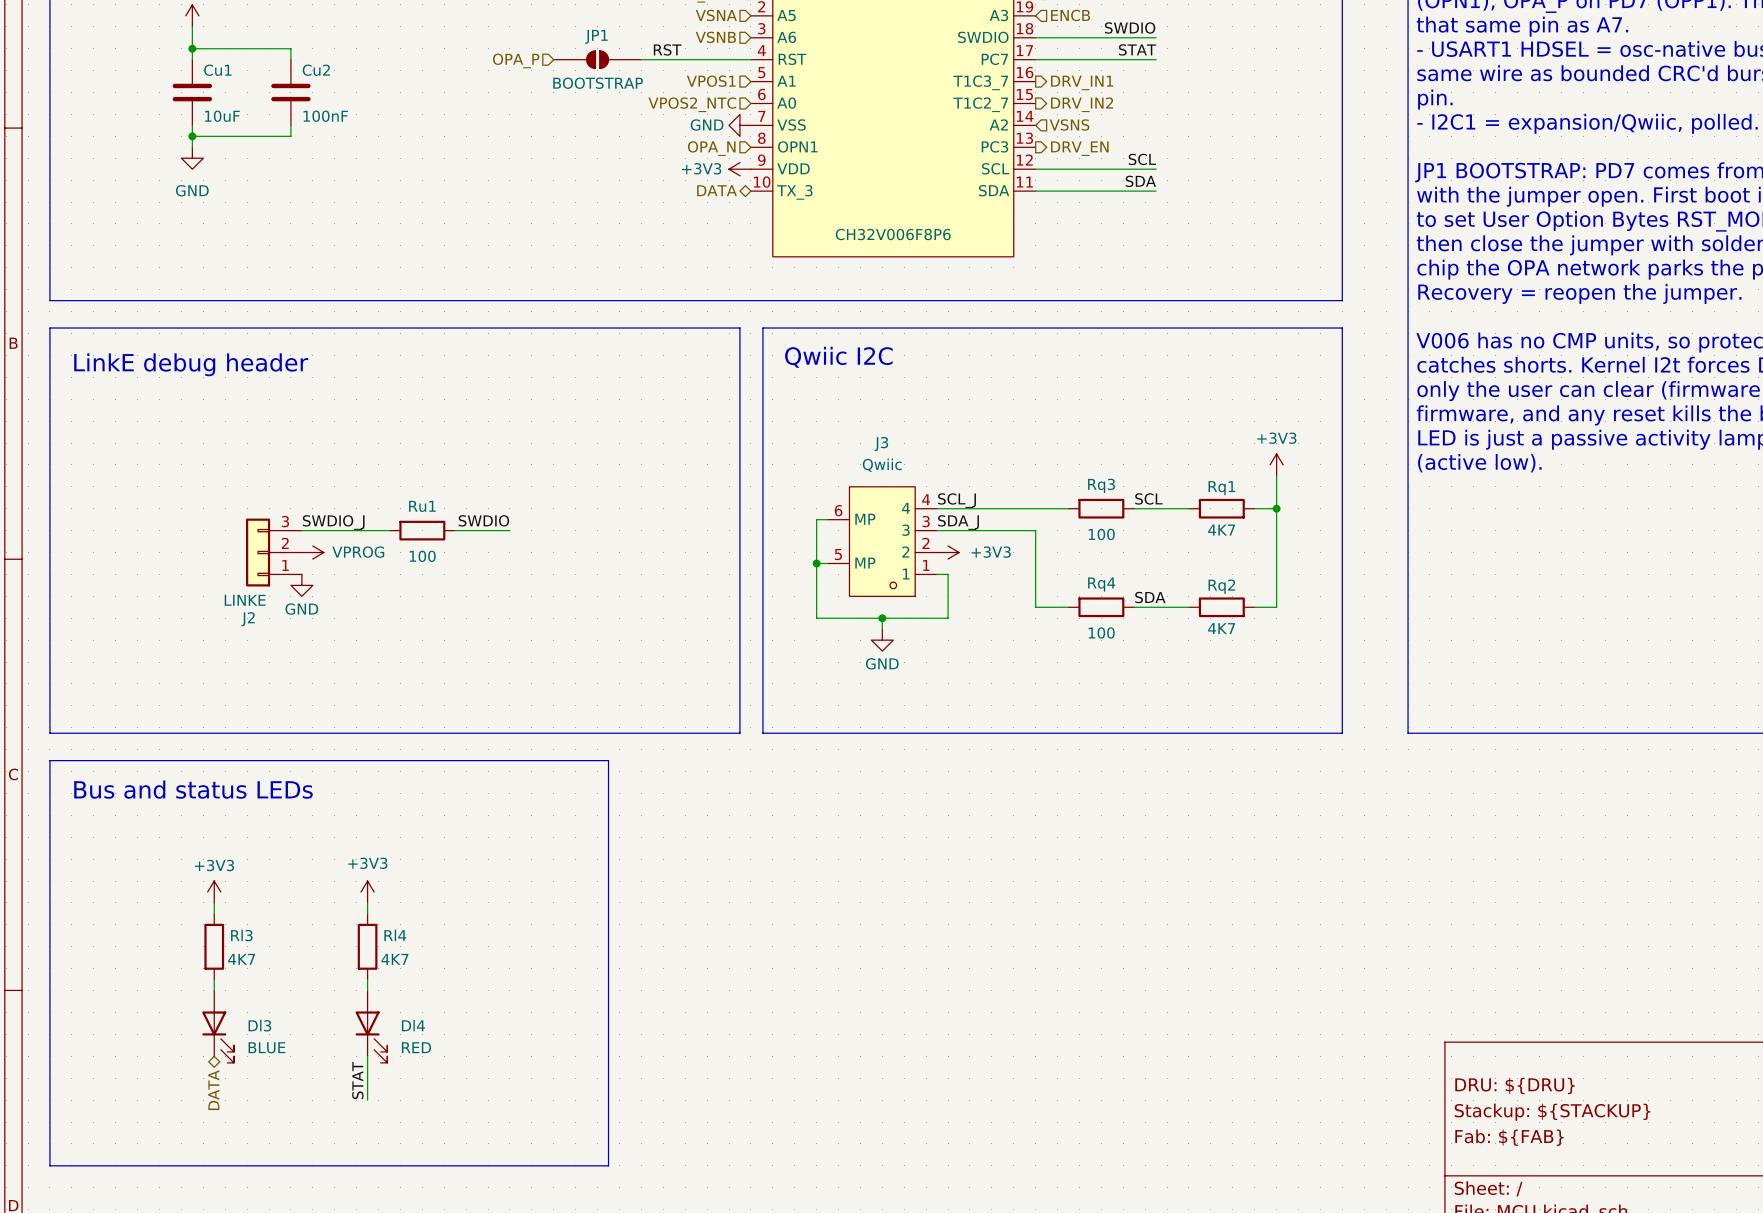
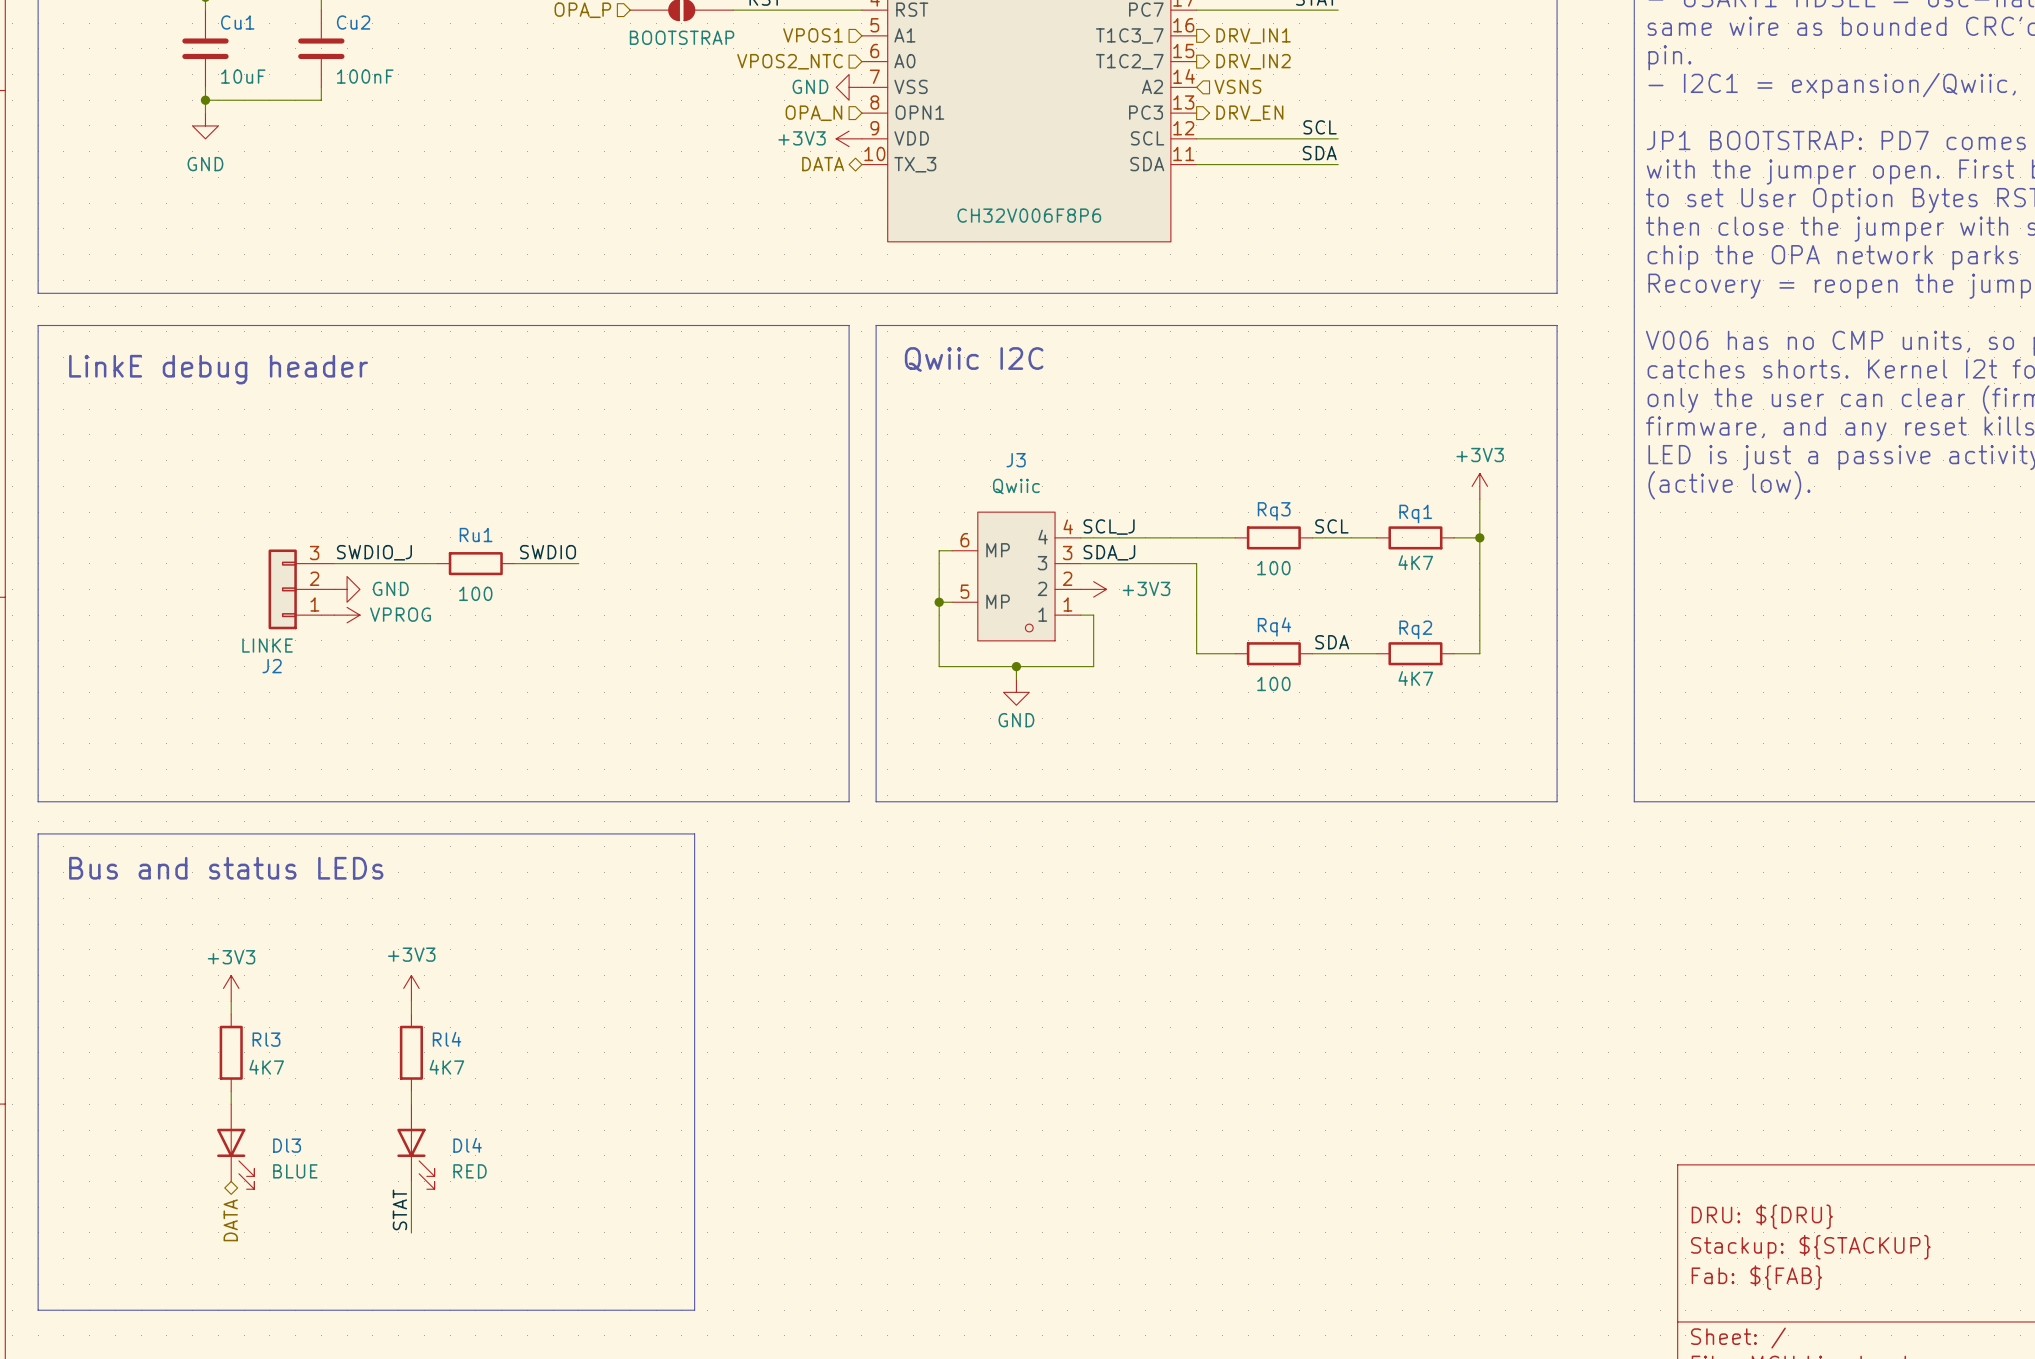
power symbol: VPROG (312, 552) -> GND (347, 589)
power symbol: none -> VPROG (347, 615)
power symbol: GND (301, 585) -> none

